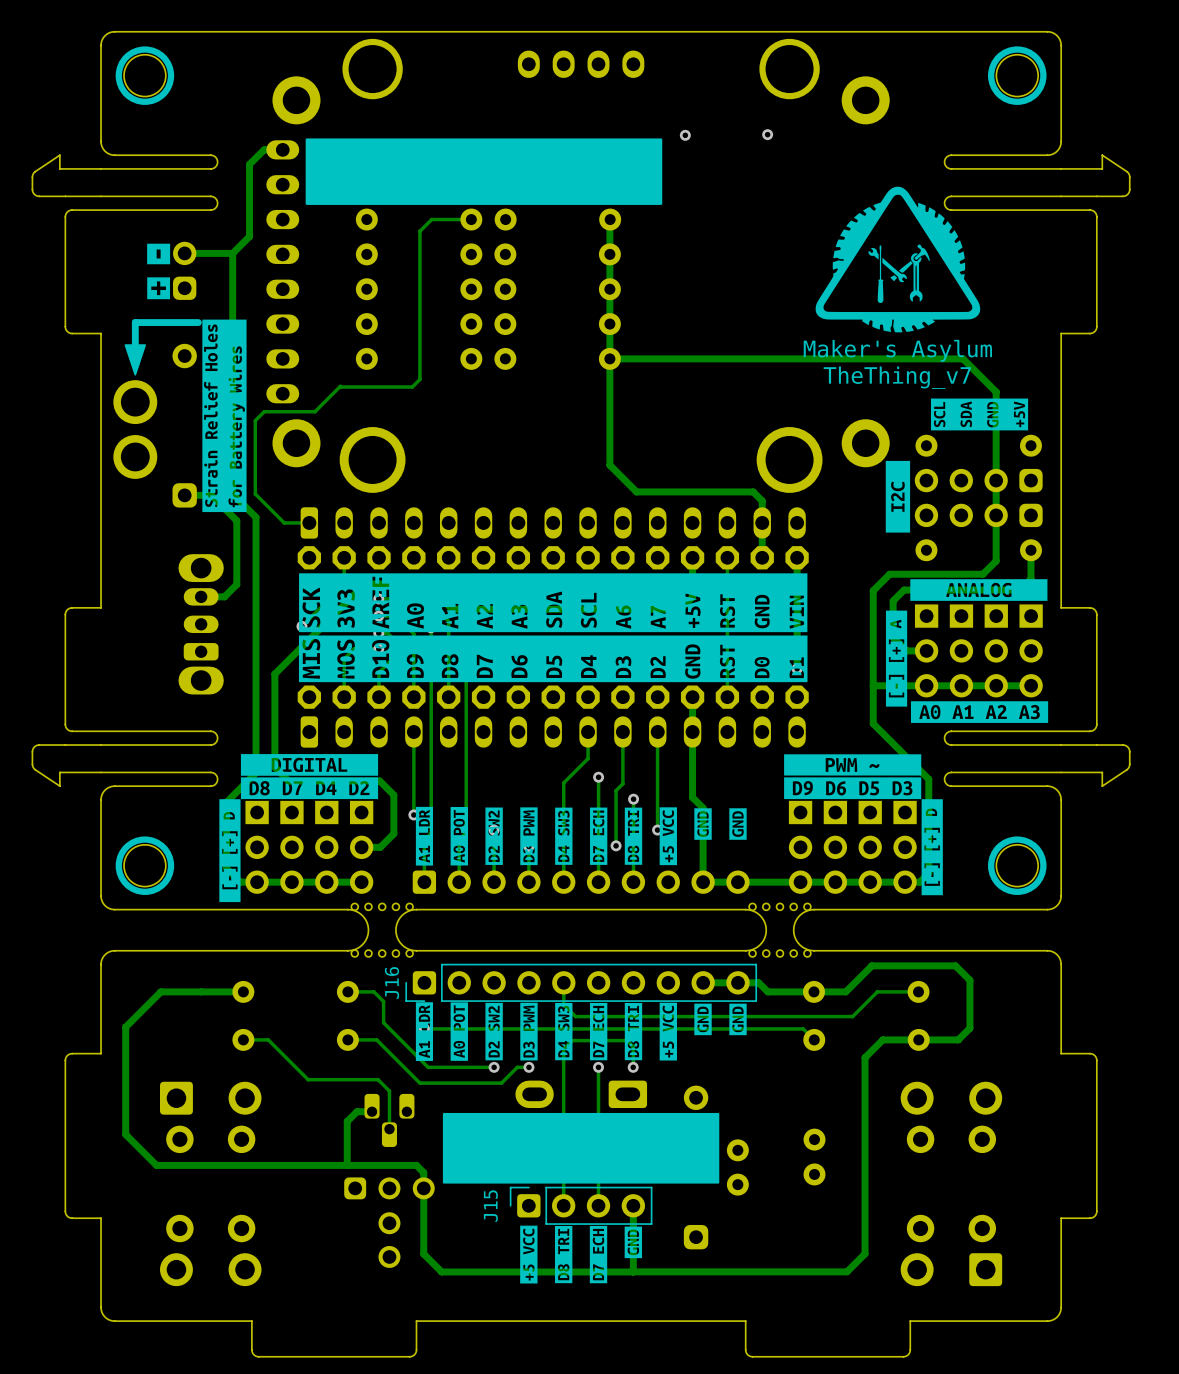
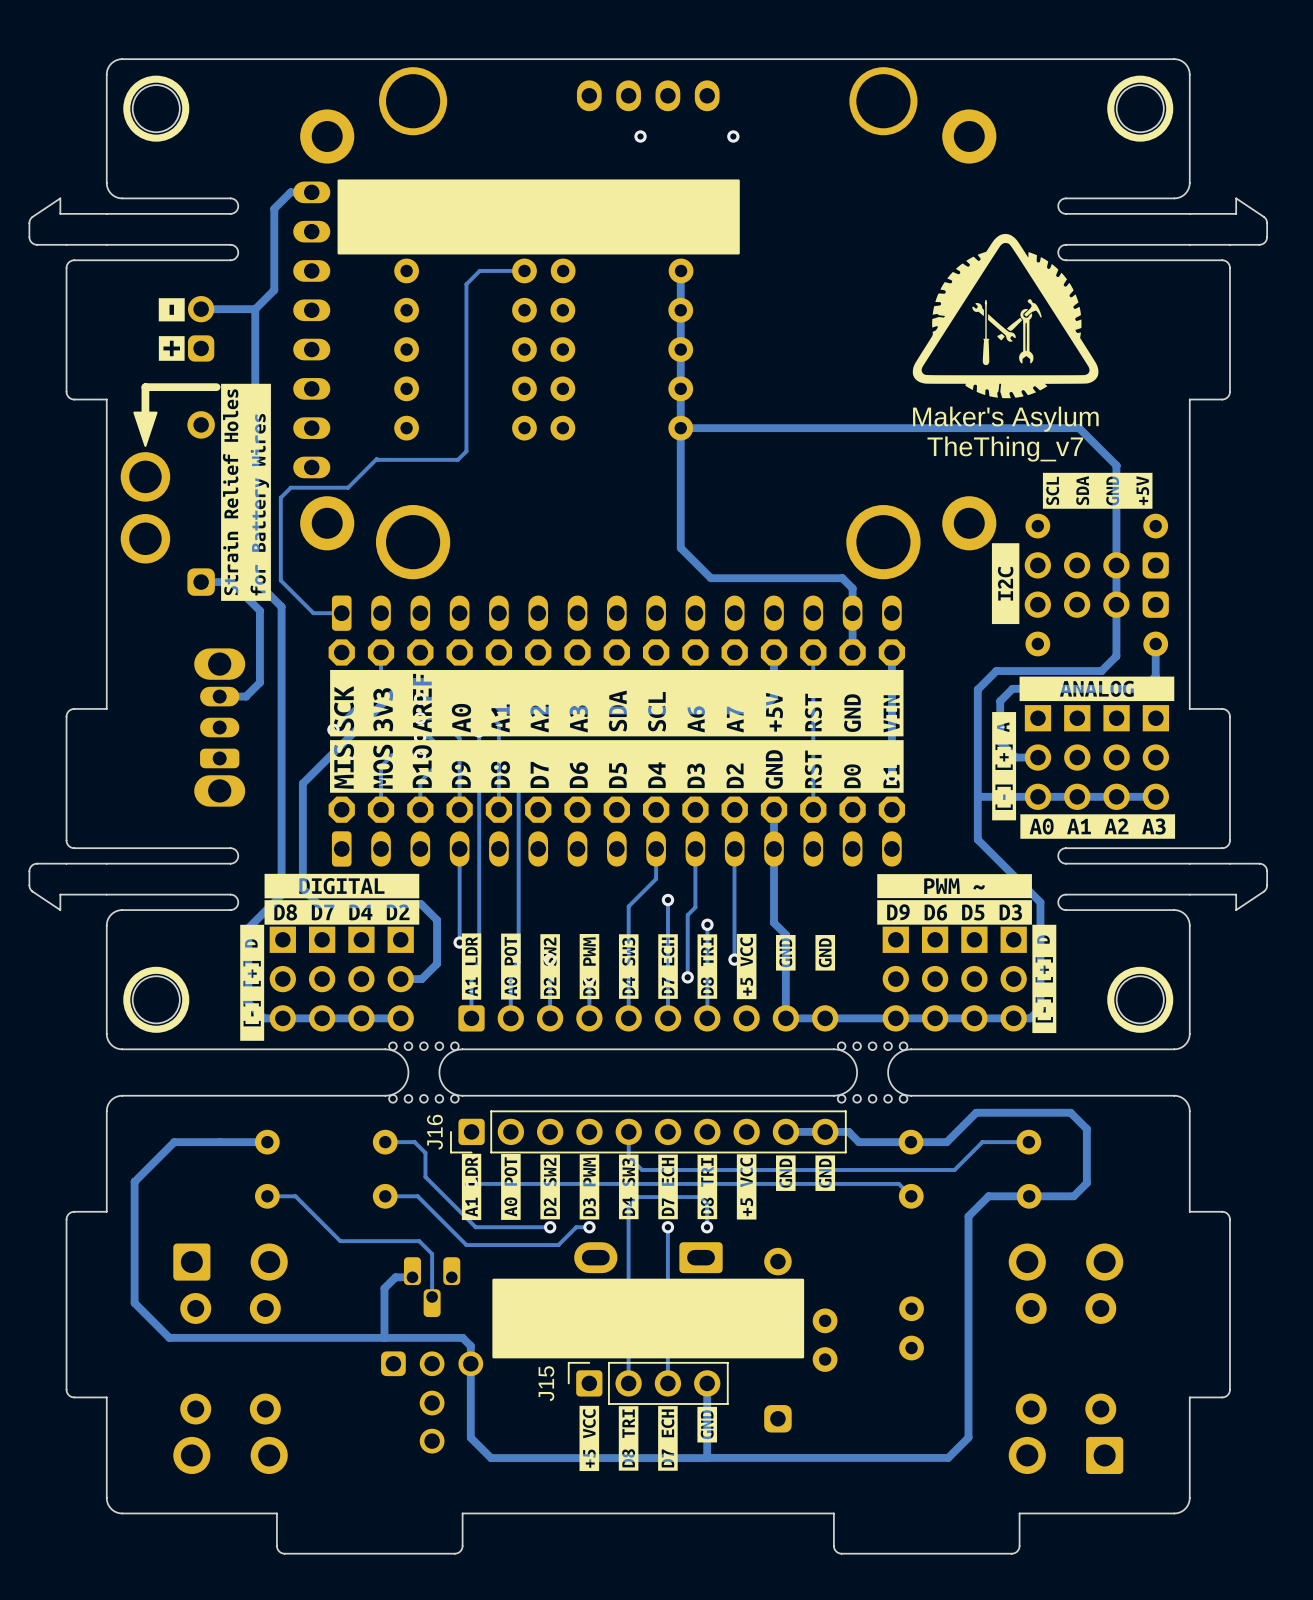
via: none -> (640, 136)
via: (767, 134) -> none
via position: (685, 135) -> (733, 136)

